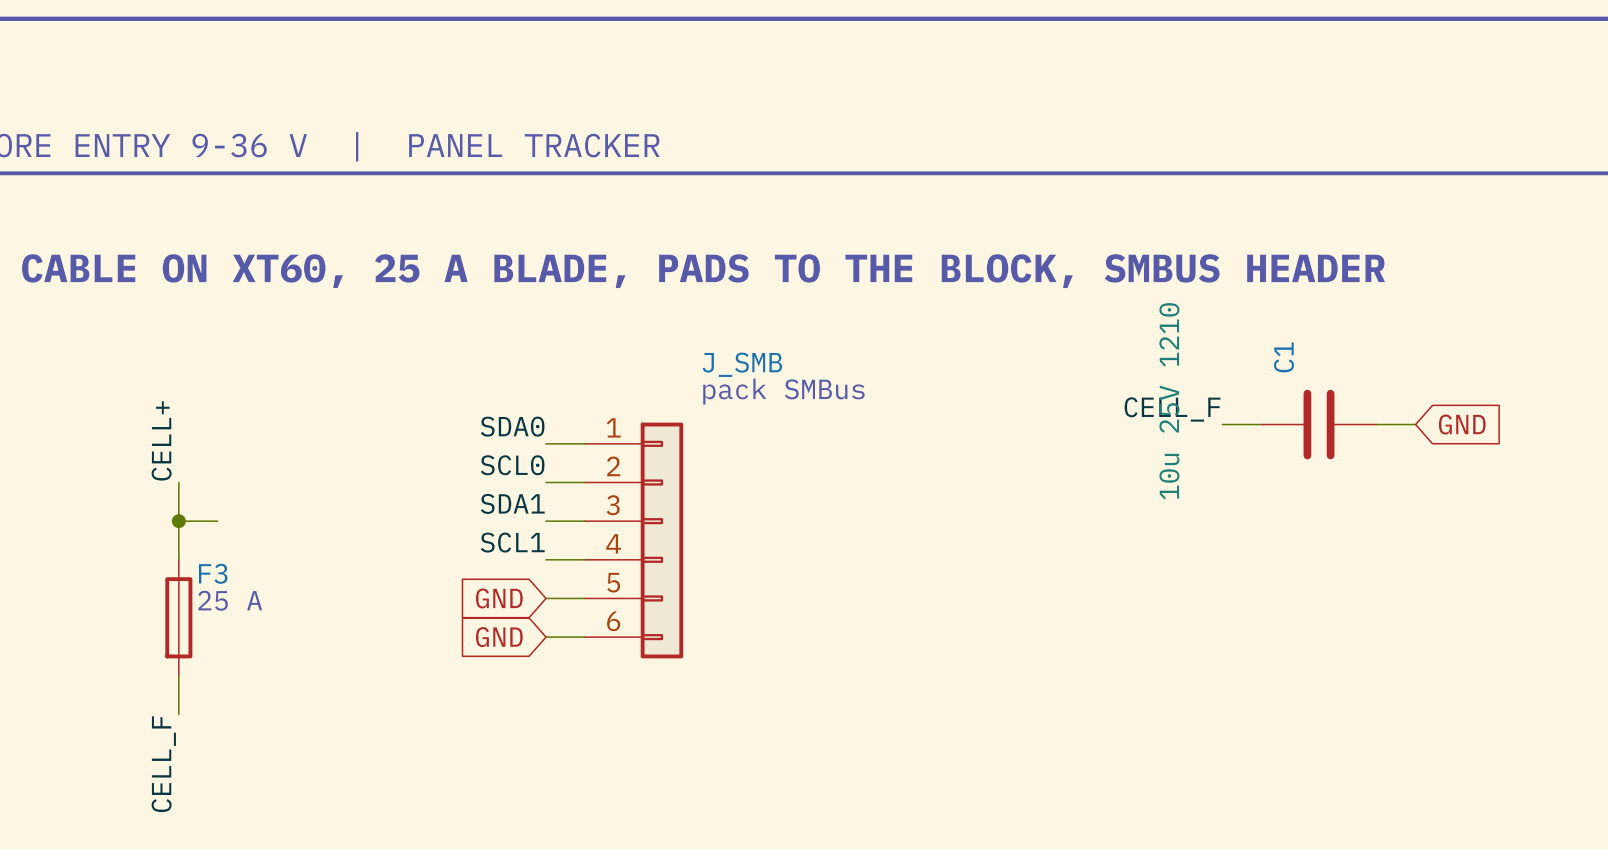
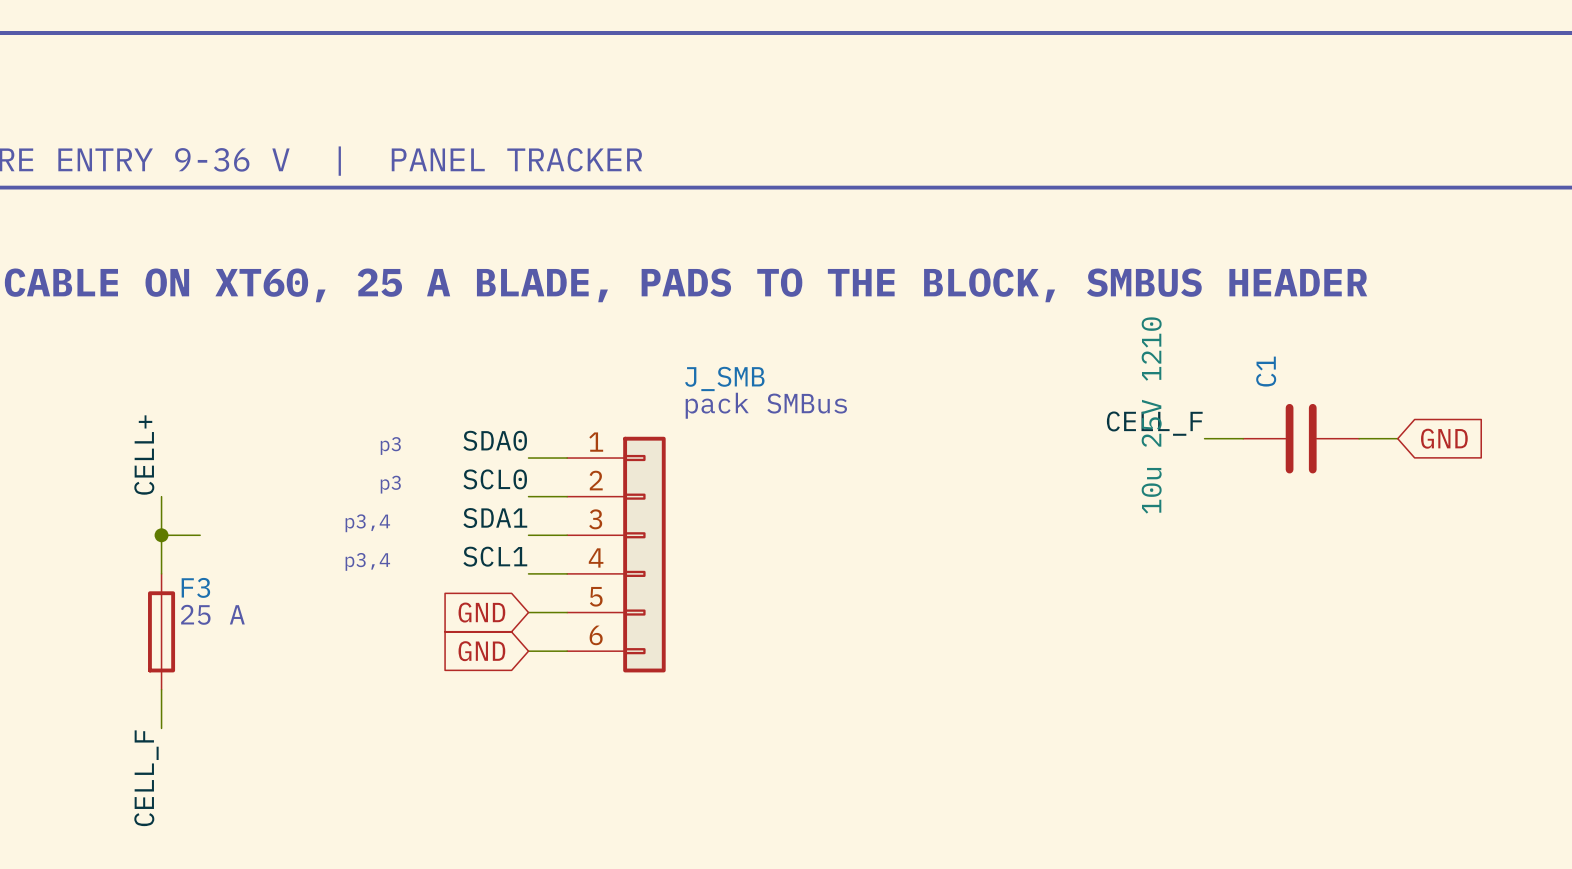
text: none -> p3 (390, 446)
text: none -> p3 (390, 484)
text: none -> p3,4 (367, 523)
text: none -> p3,4 (367, 561)

